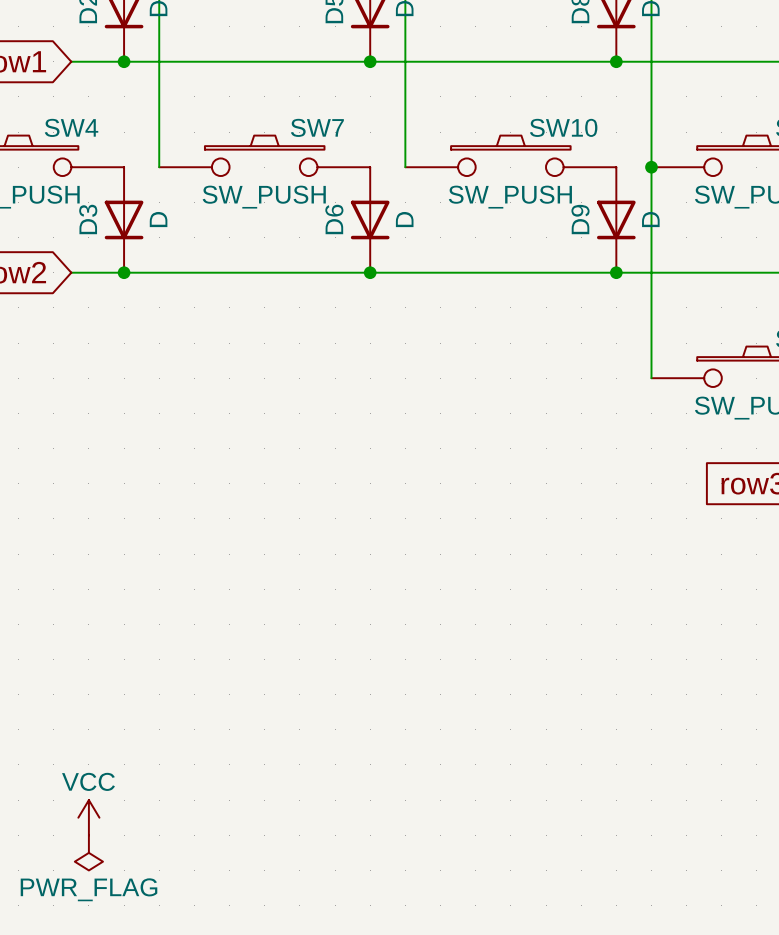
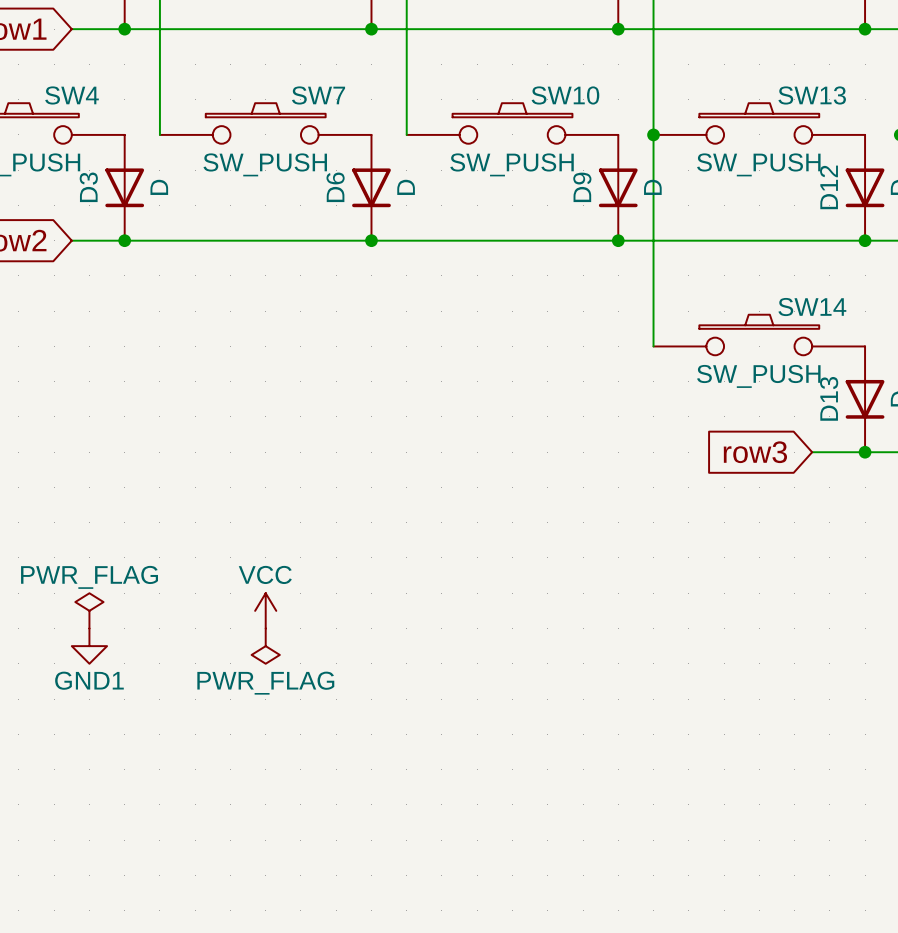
power symbol: none -> PWR_FLAG (89, 610)
power symbol: none -> GND1 (89, 646)
power symbol: none -> PWR_FLAG (265, 646)
power symbol position: VCC (88, 817) -> VCC (265, 610)
power symbol: PWR_FLAG (88, 852) -> none

